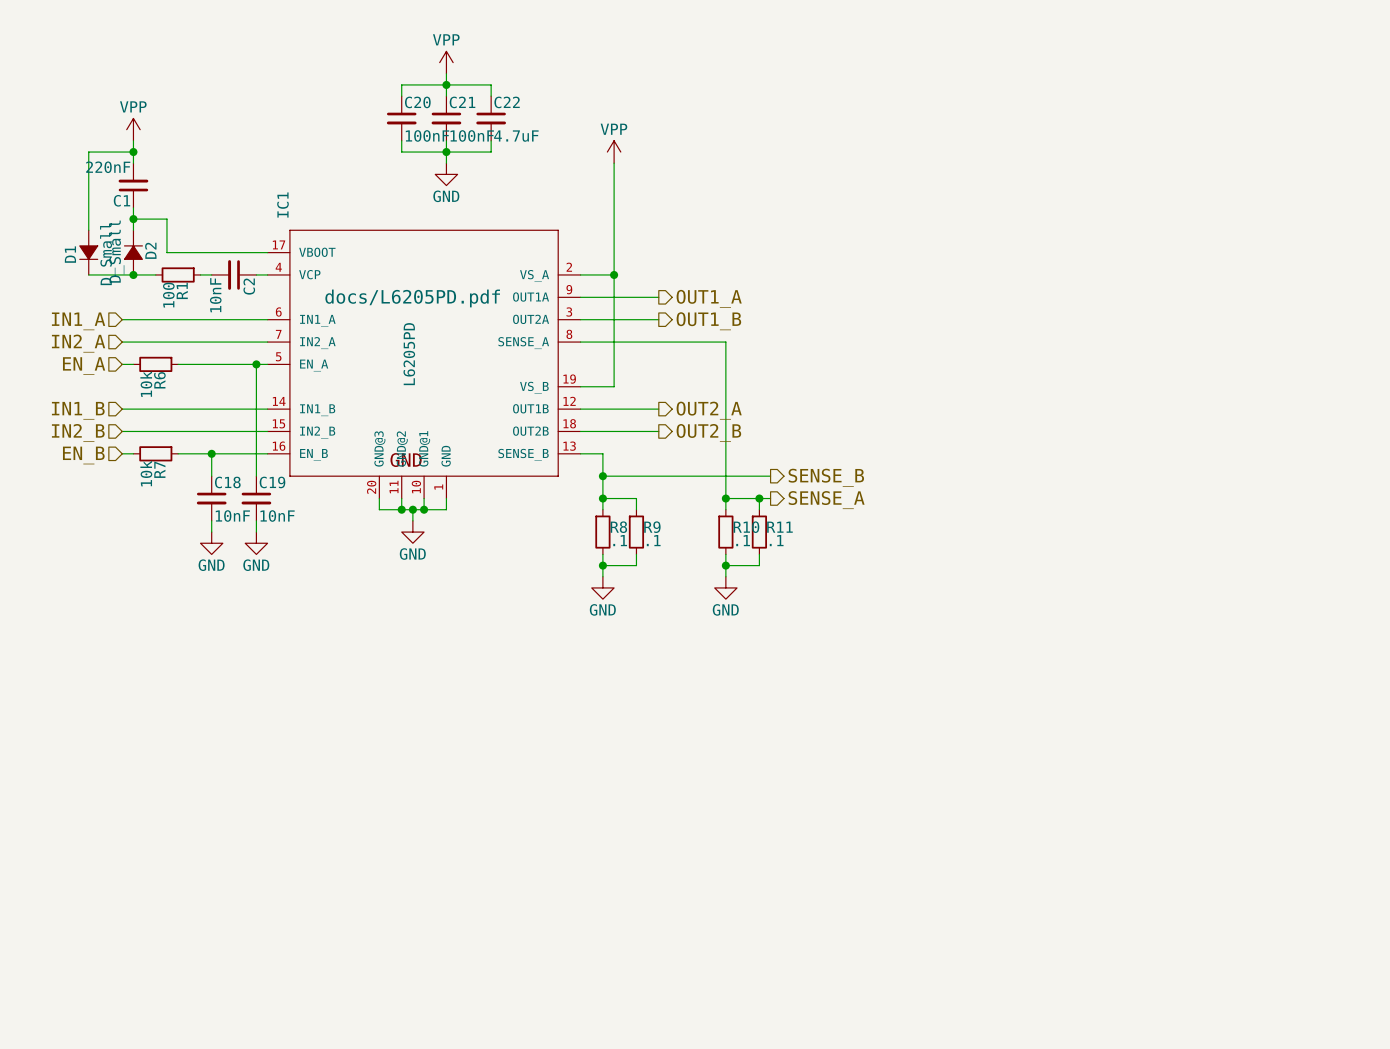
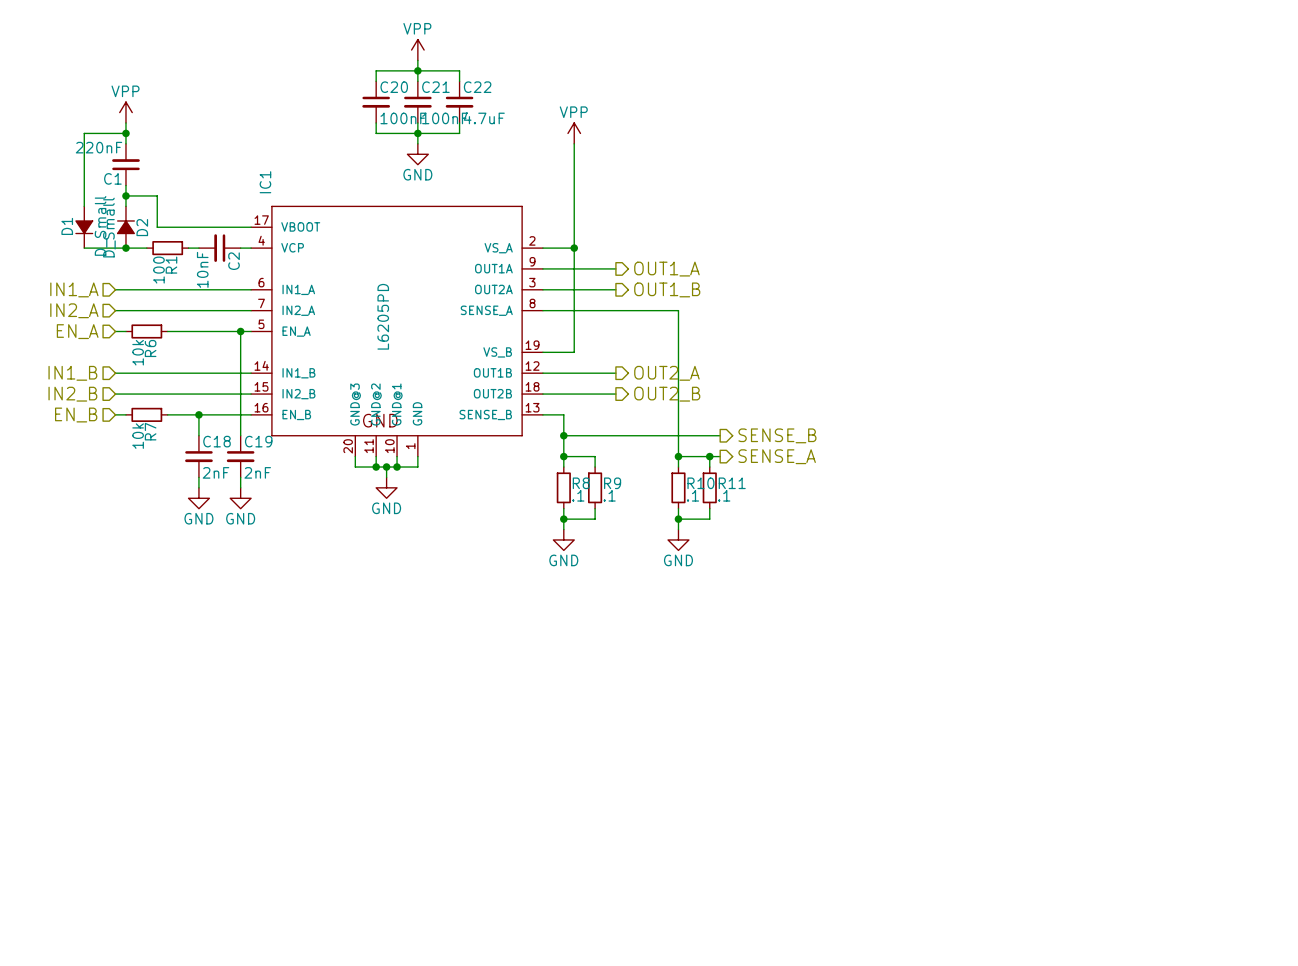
IC1 text: docs/L6205PD.pdf (412, 298) -> none
C18 value: 10nF (232, 516) -> 2nF (216, 472)
C19 value: 10nF (277, 516) -> 2nF (257, 472)

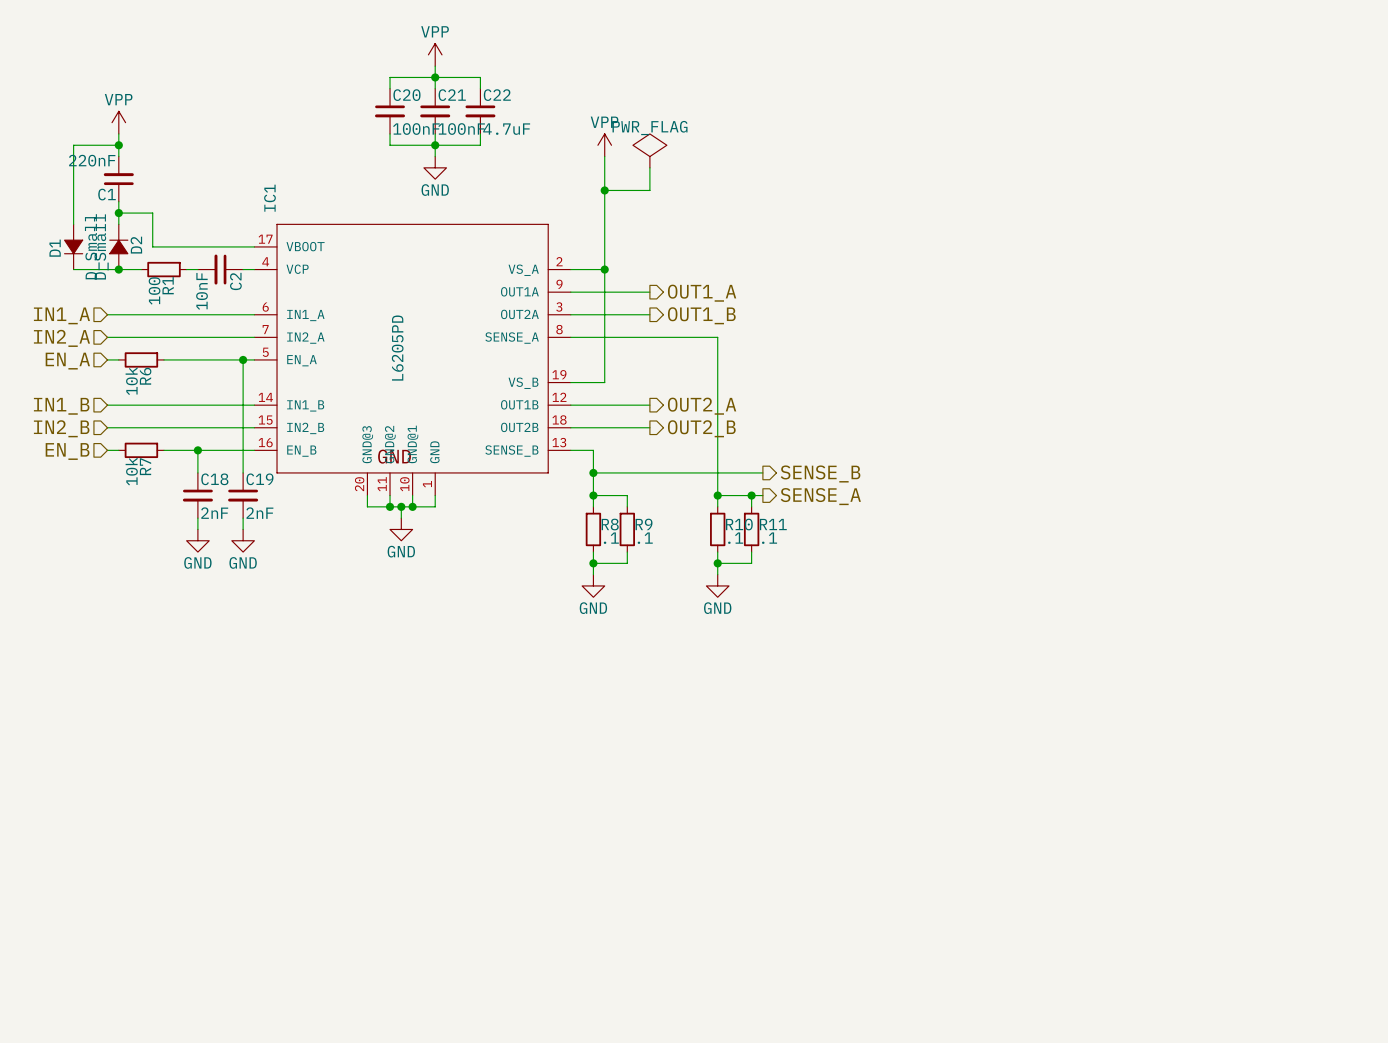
power symbol: none -> PWR_FLAG (649, 150)
wire: none -> (649, 167) (649, 190) (604, 190)
junction: none -> (604, 190)

